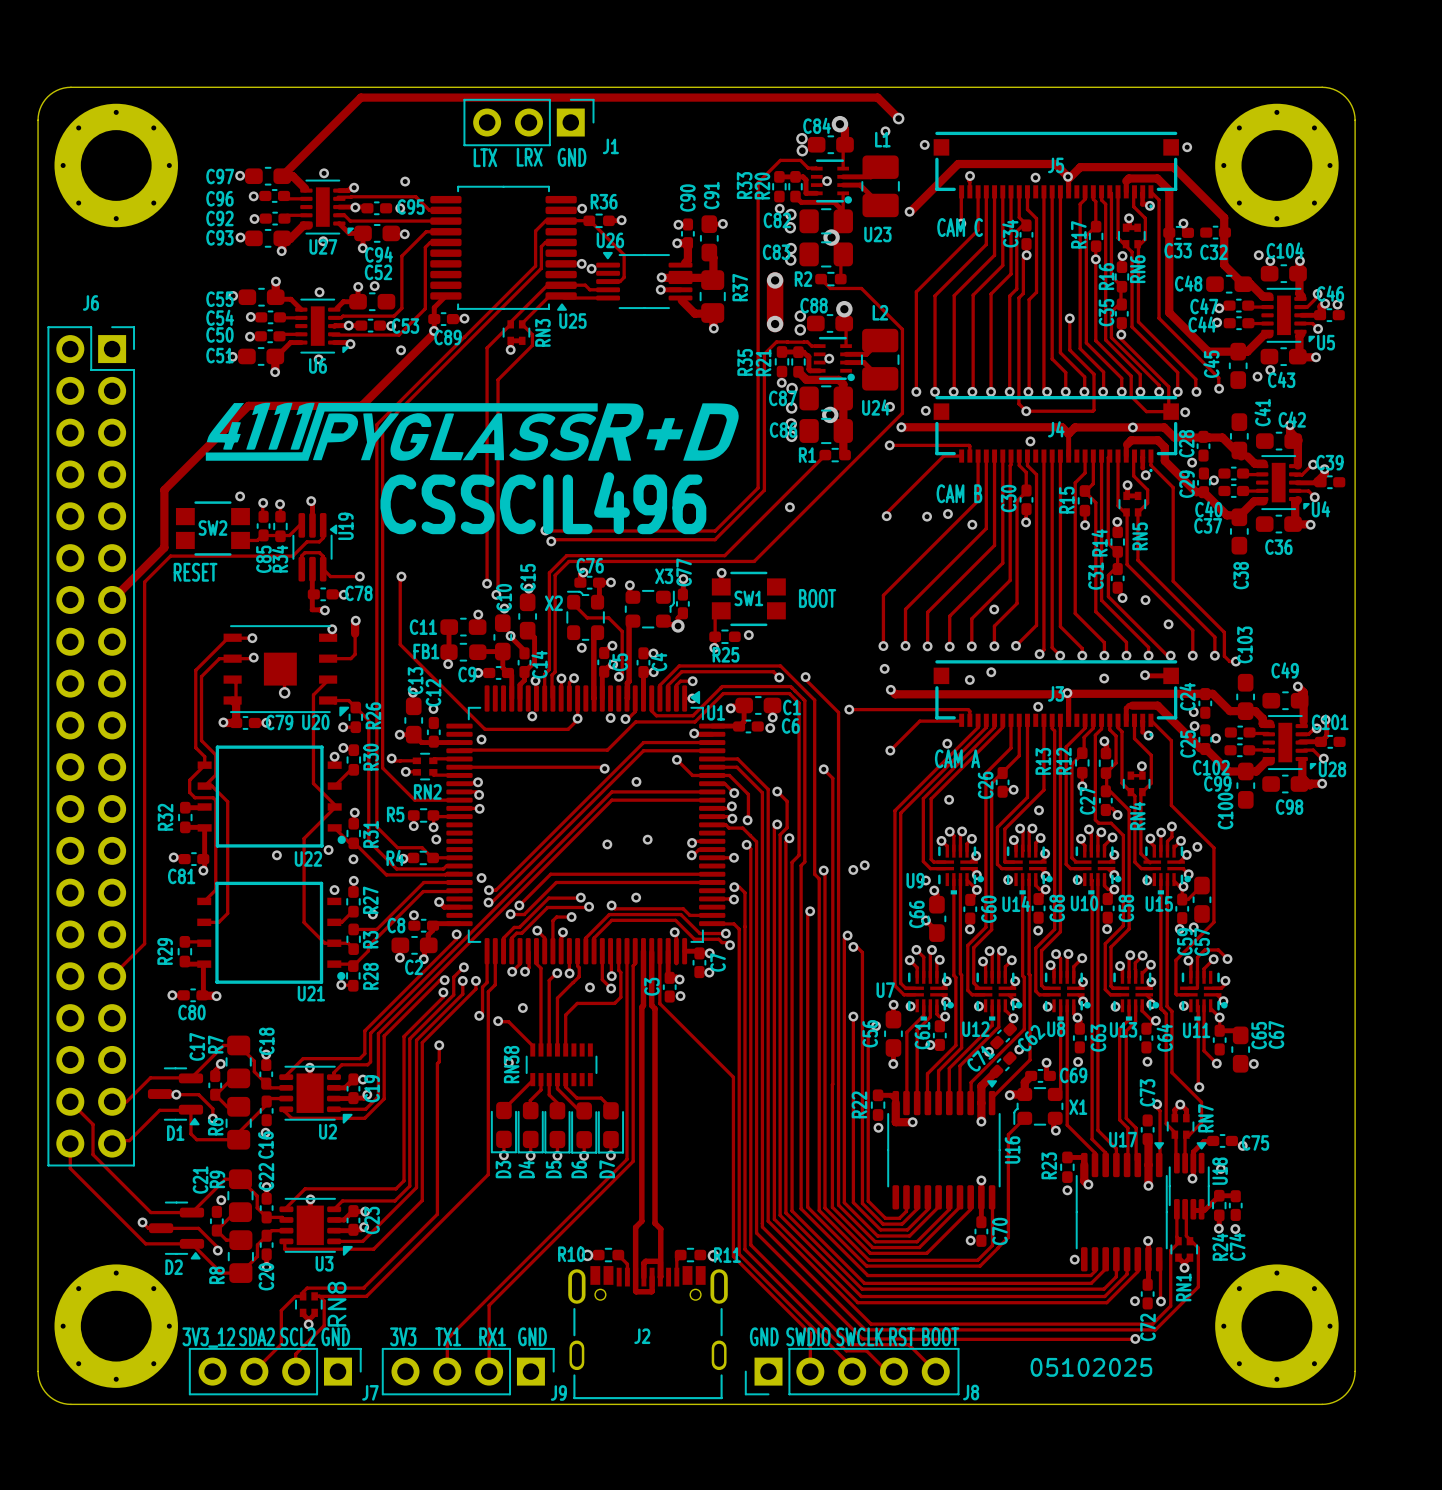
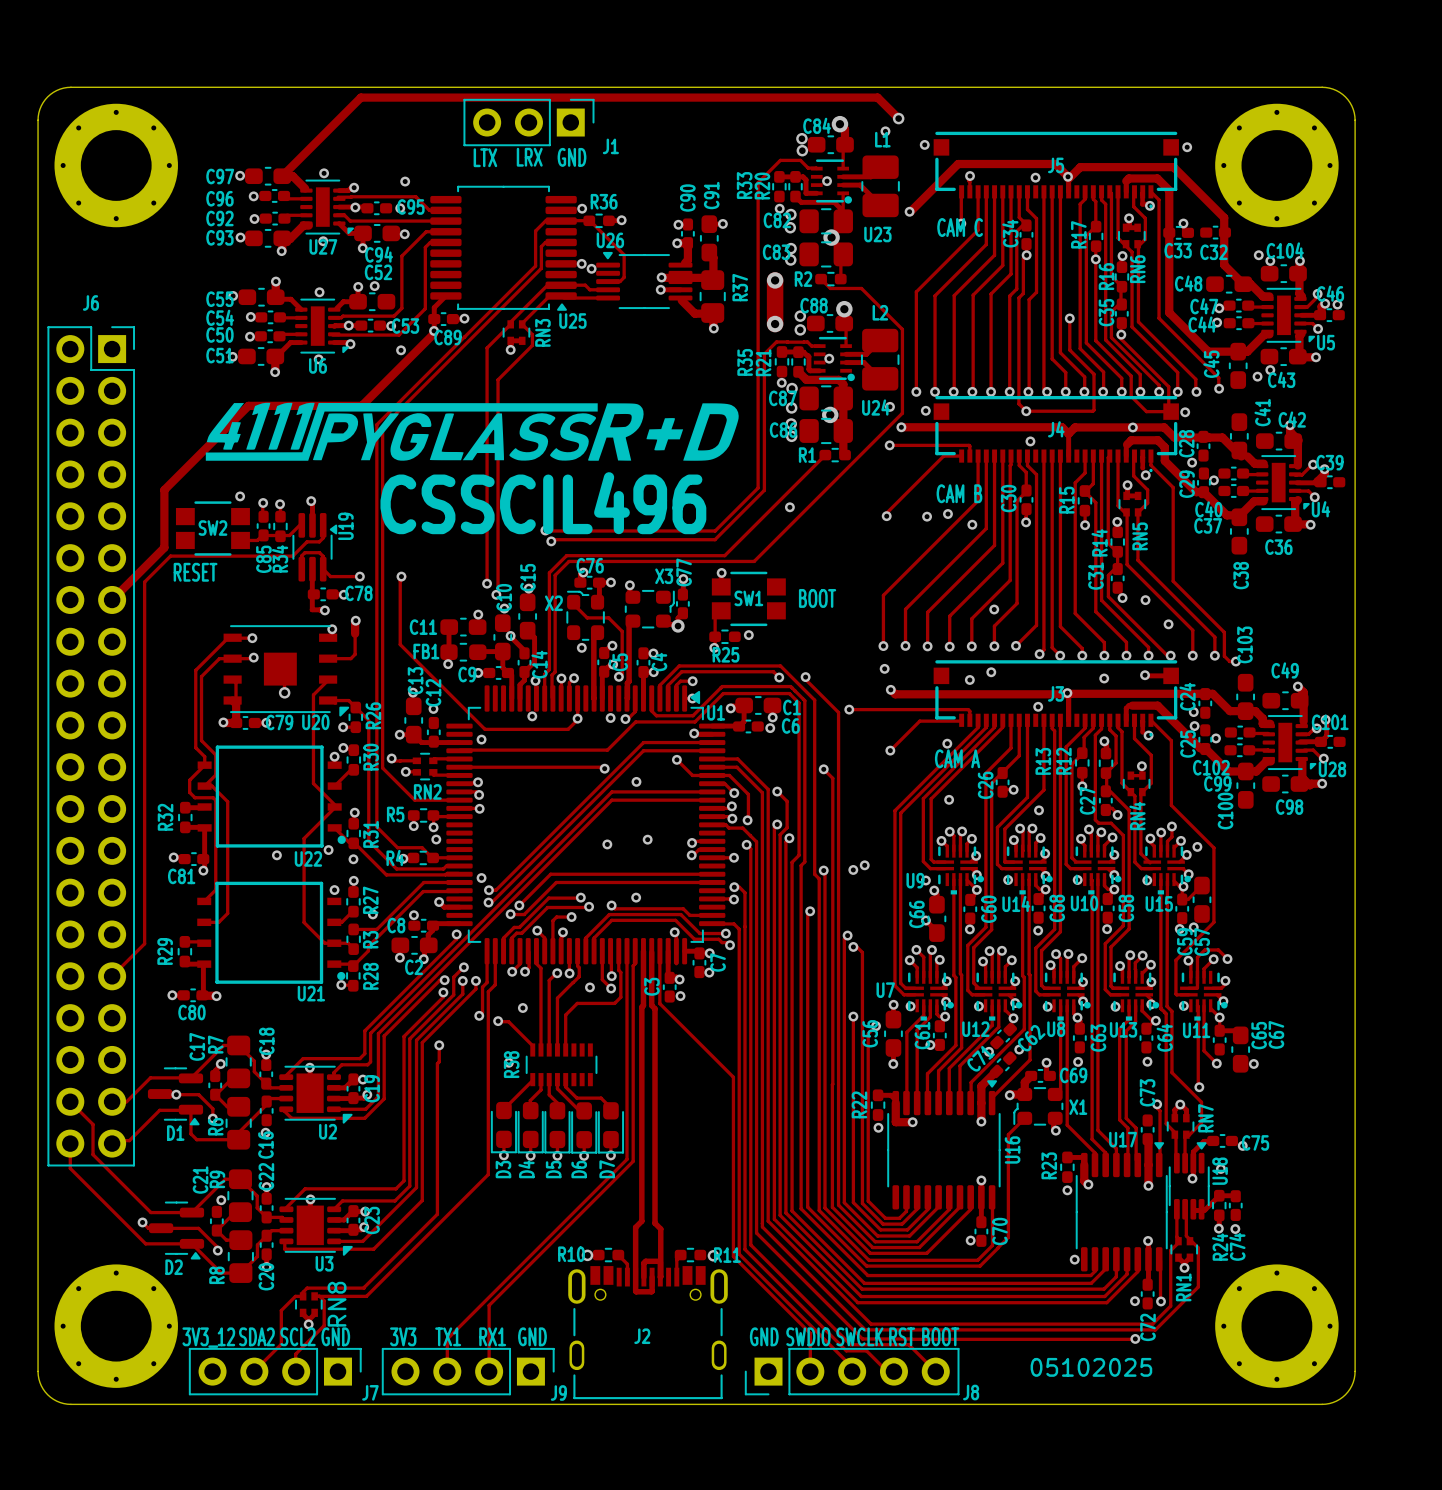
RN38 name: RN38 (511, 1064) -> R38 (511, 1064)

